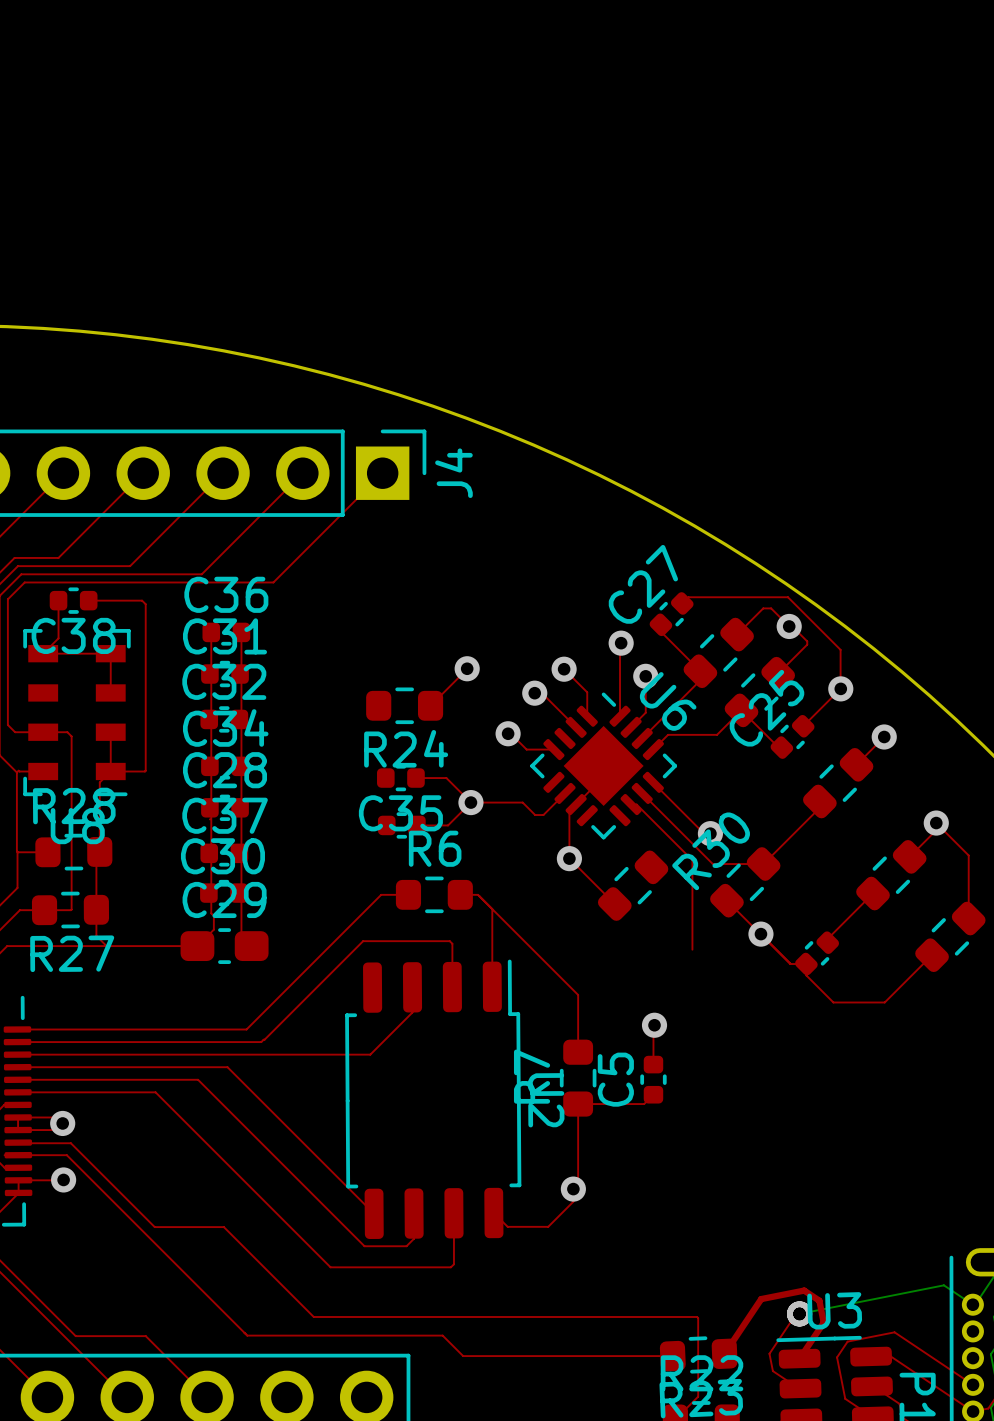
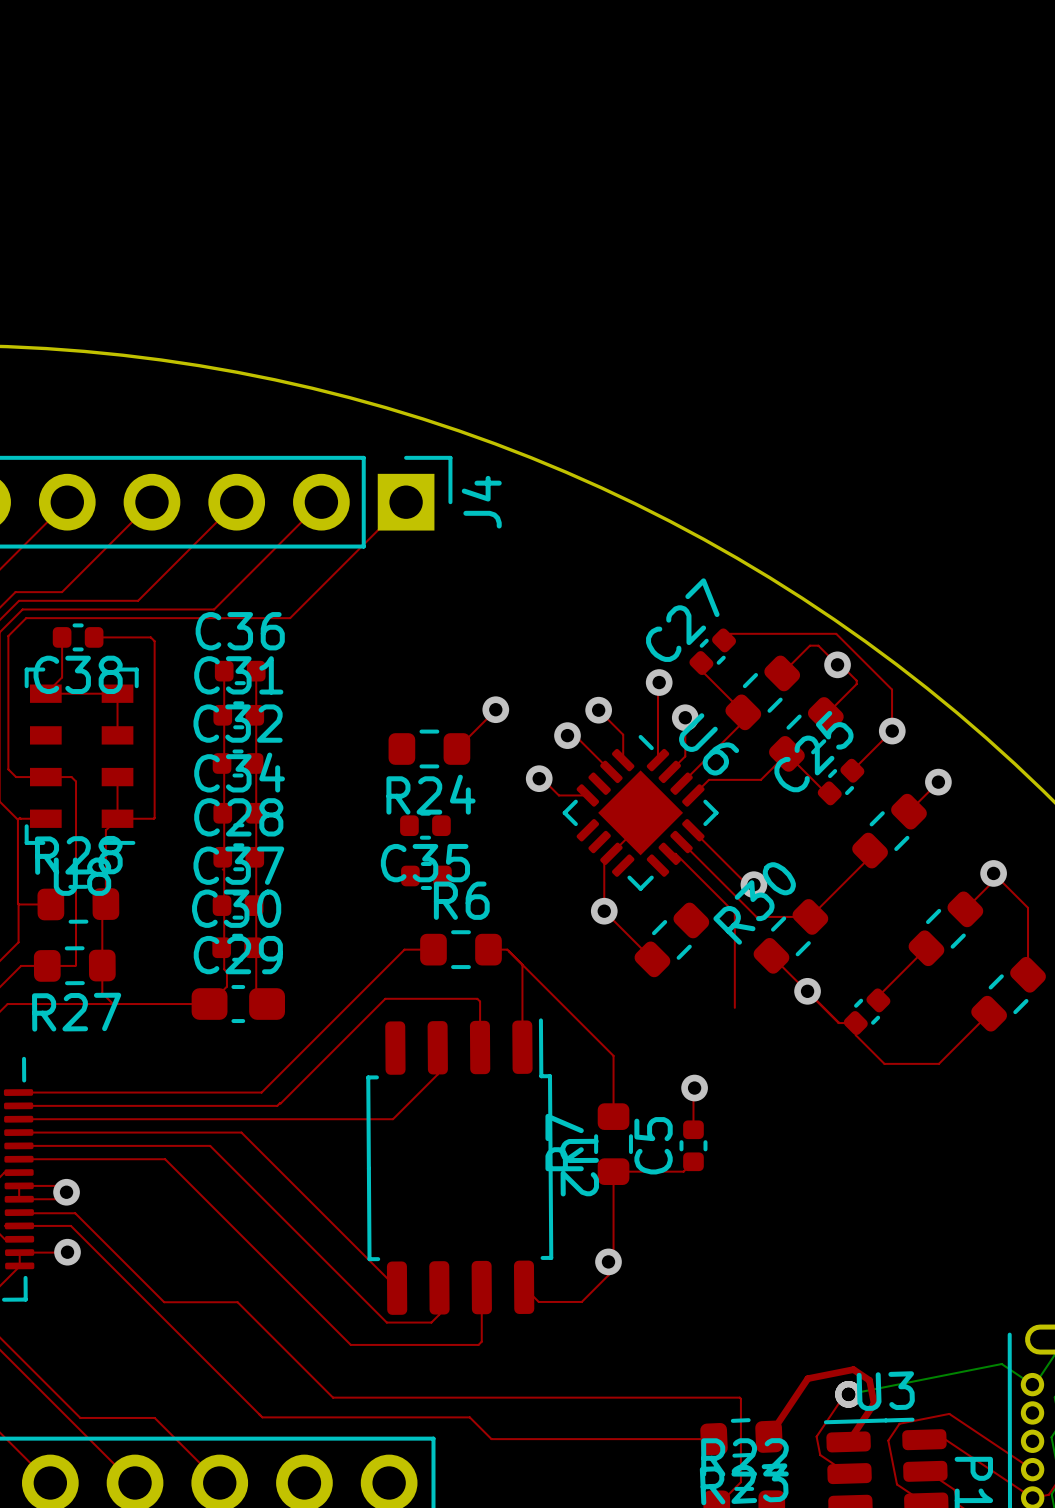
top track: (415, 778) (446, 778) (470, 802) -> none
top track: (565, 793) (543, 815) (535, 815) (522, 802) (470, 802) -> none
top track: (470, 802) (448, 825) (416, 825) -> none
via: (470, 802) -> none

